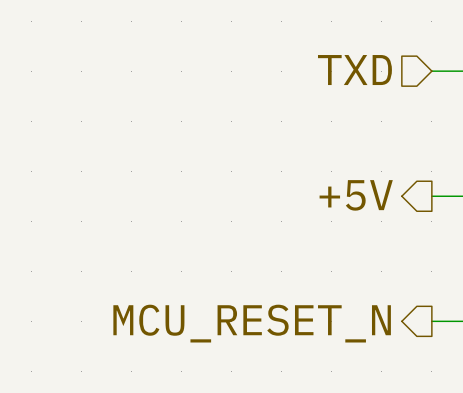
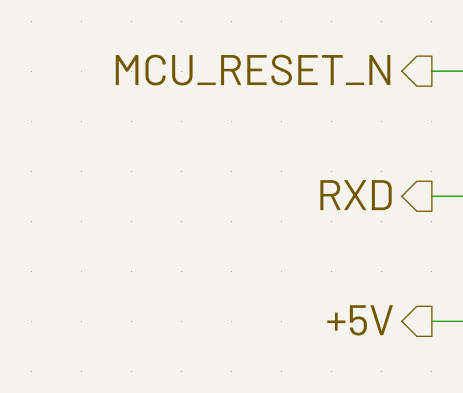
hierarchical label shape: input (354, 70) -> output (253, 70)
hierarchical label: TXD (354, 70) -> MCU_RESET_N (253, 70)
hierarchical label: +5V (356, 195) -> RXD (356, 195)
hierarchical label: MCU_RESET_N (252, 323) -> +5V (360, 320)

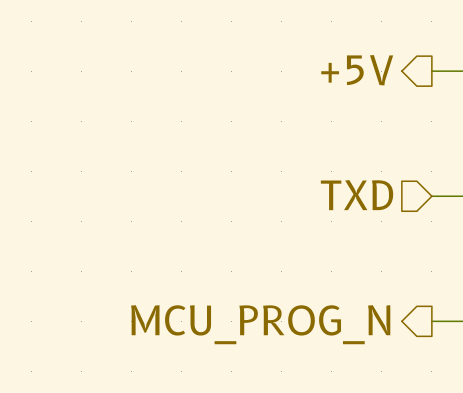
hierarchical label: MCU_RESET_N (253, 70) -> +5V (357, 70)
hierarchical label shape: output (356, 195) -> input (357, 195)
hierarchical label: RXD (356, 195) -> TXD (357, 195)
hierarchical label: +5V (360, 320) -> MCU_PROG_N (260, 324)

